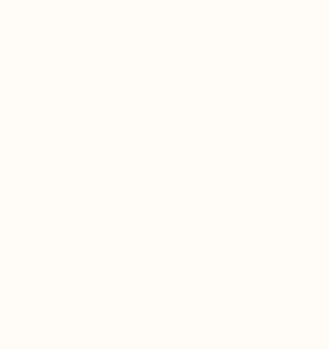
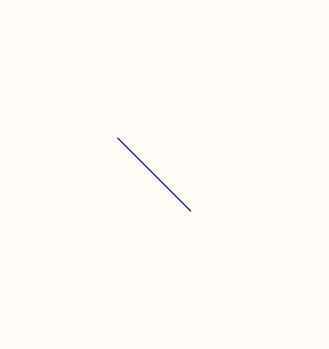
wire: none -> (117, 138) (190, 211)

